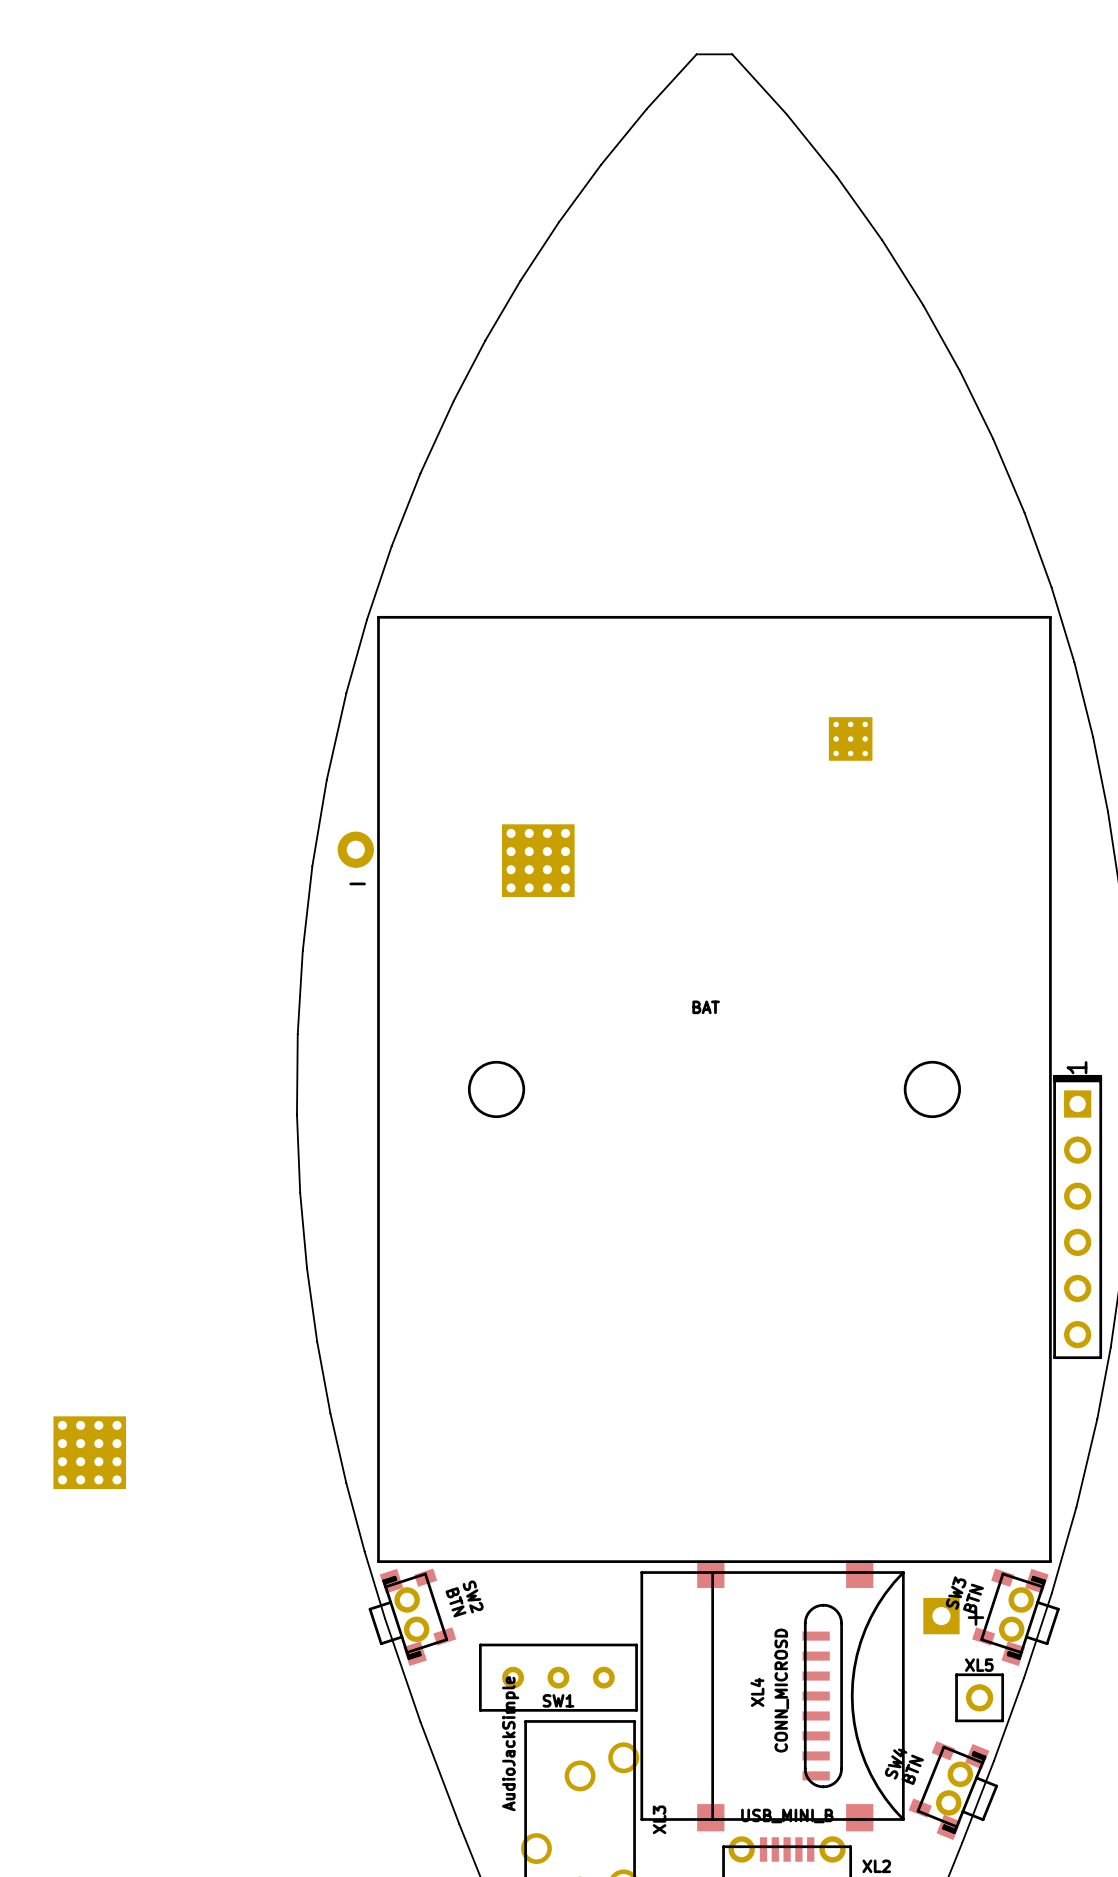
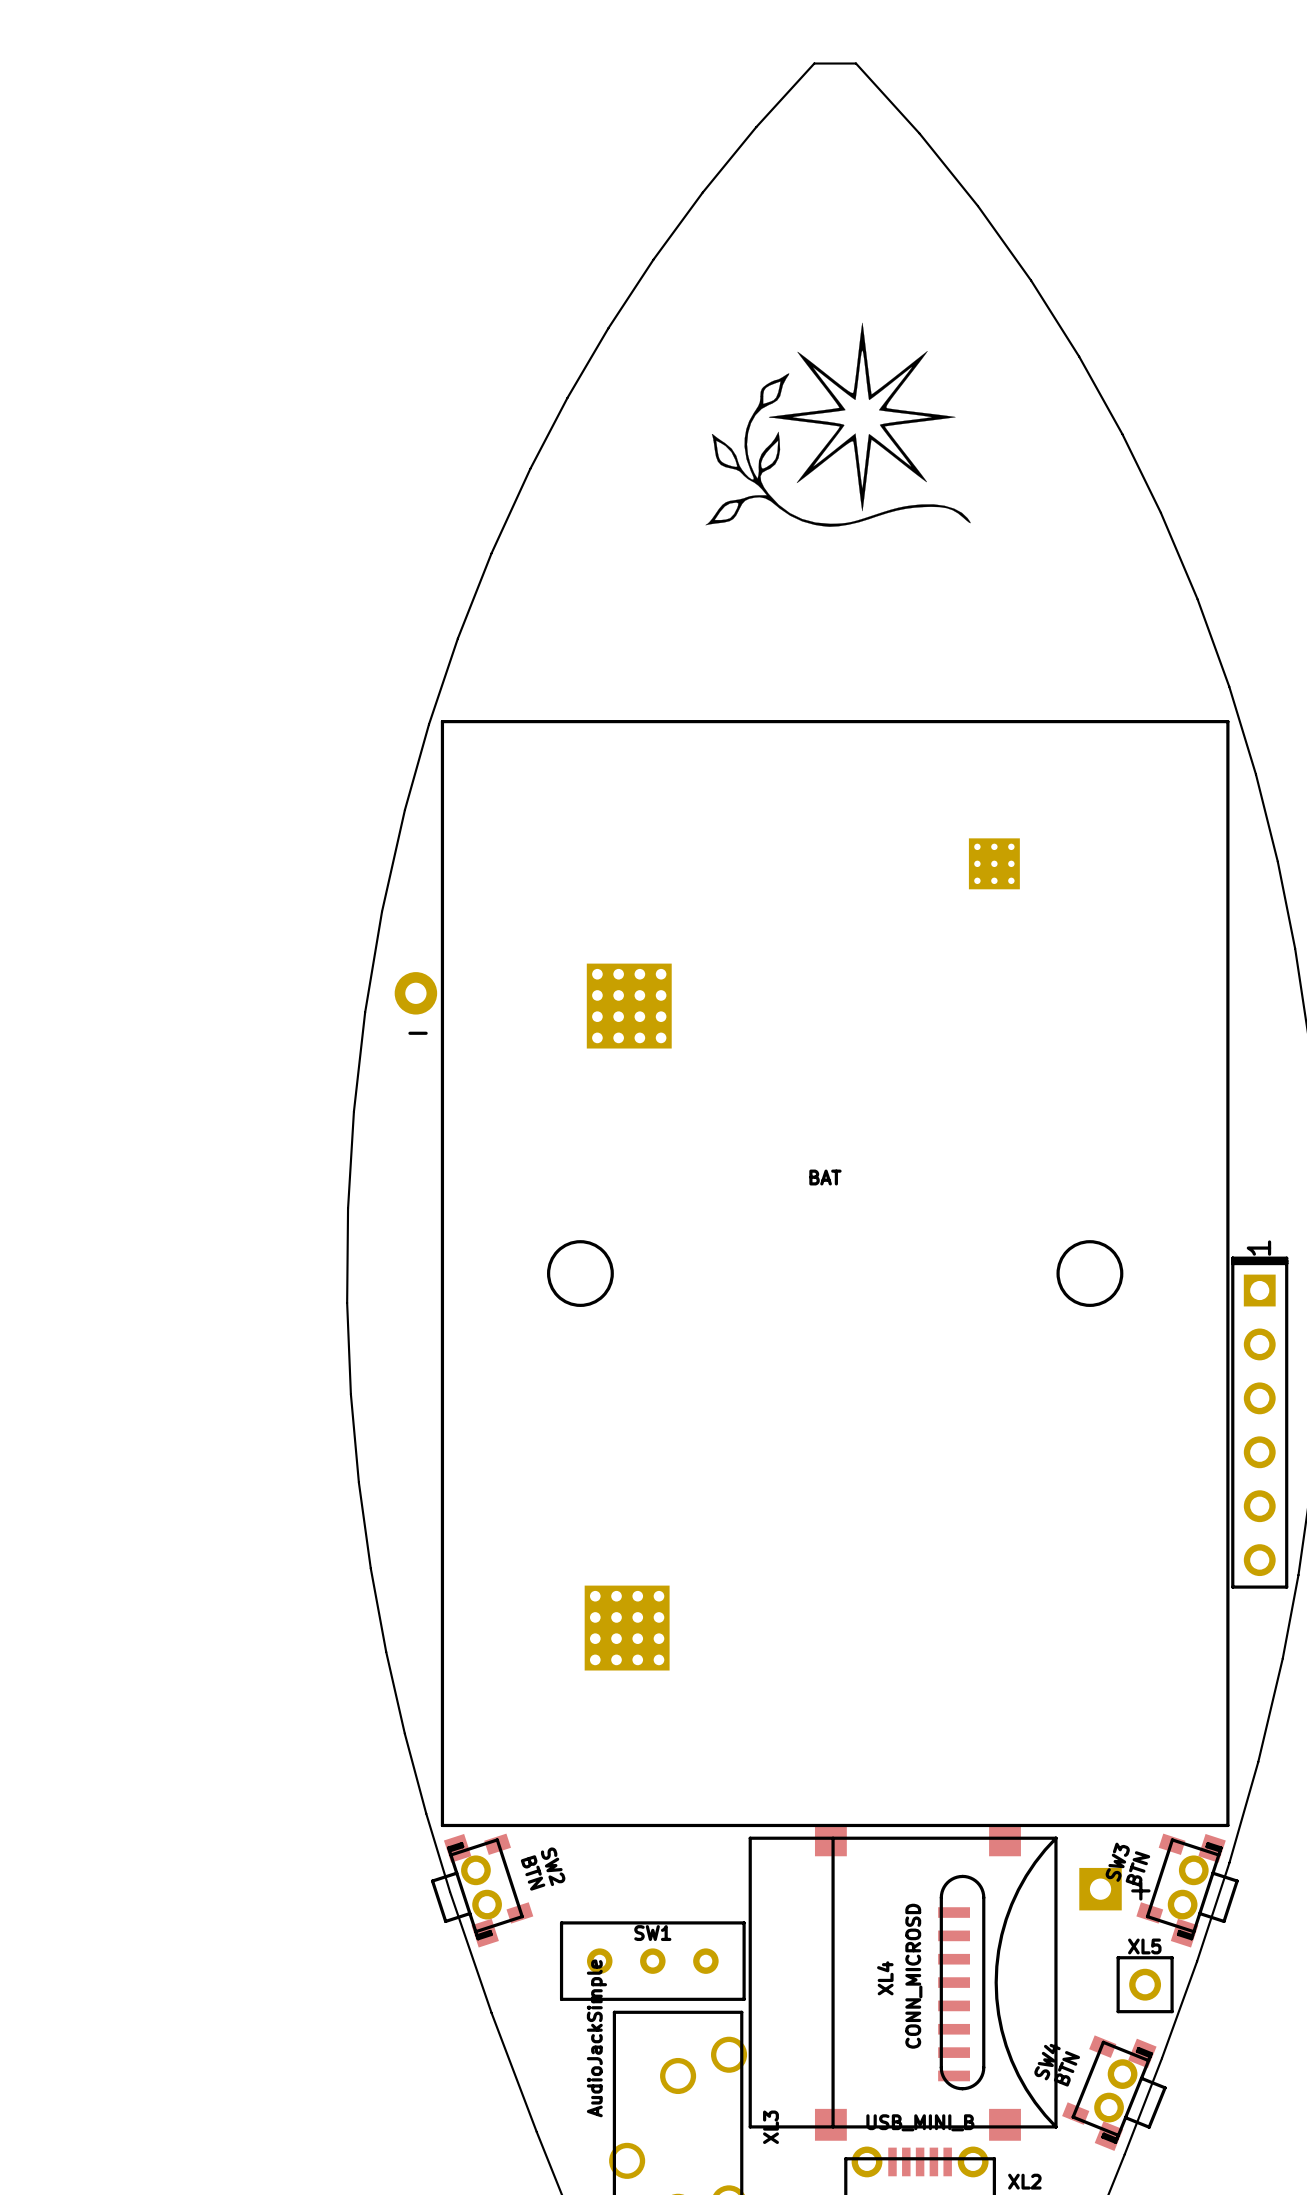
drawing: none -> [705, 322, 971, 527]
part position: (89, 1452) -> (627, 1628)
SW1 name position: SW1 (558, 1700) -> SW1 (652, 1933)

